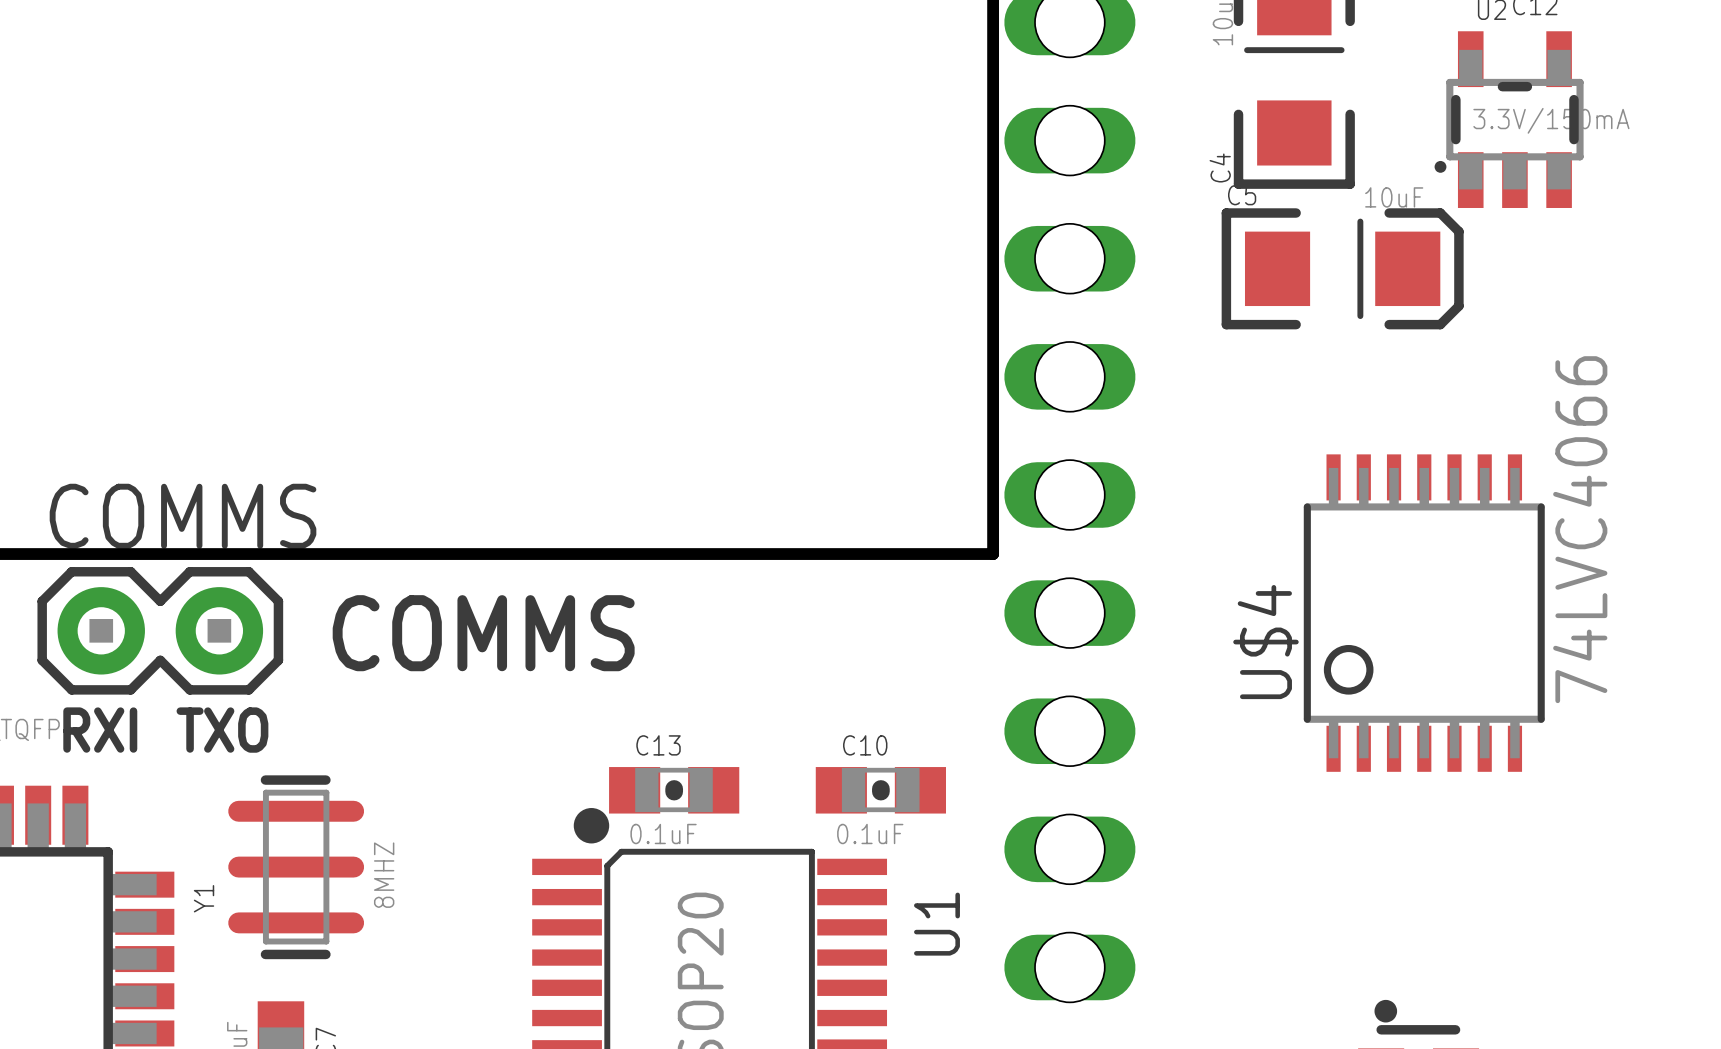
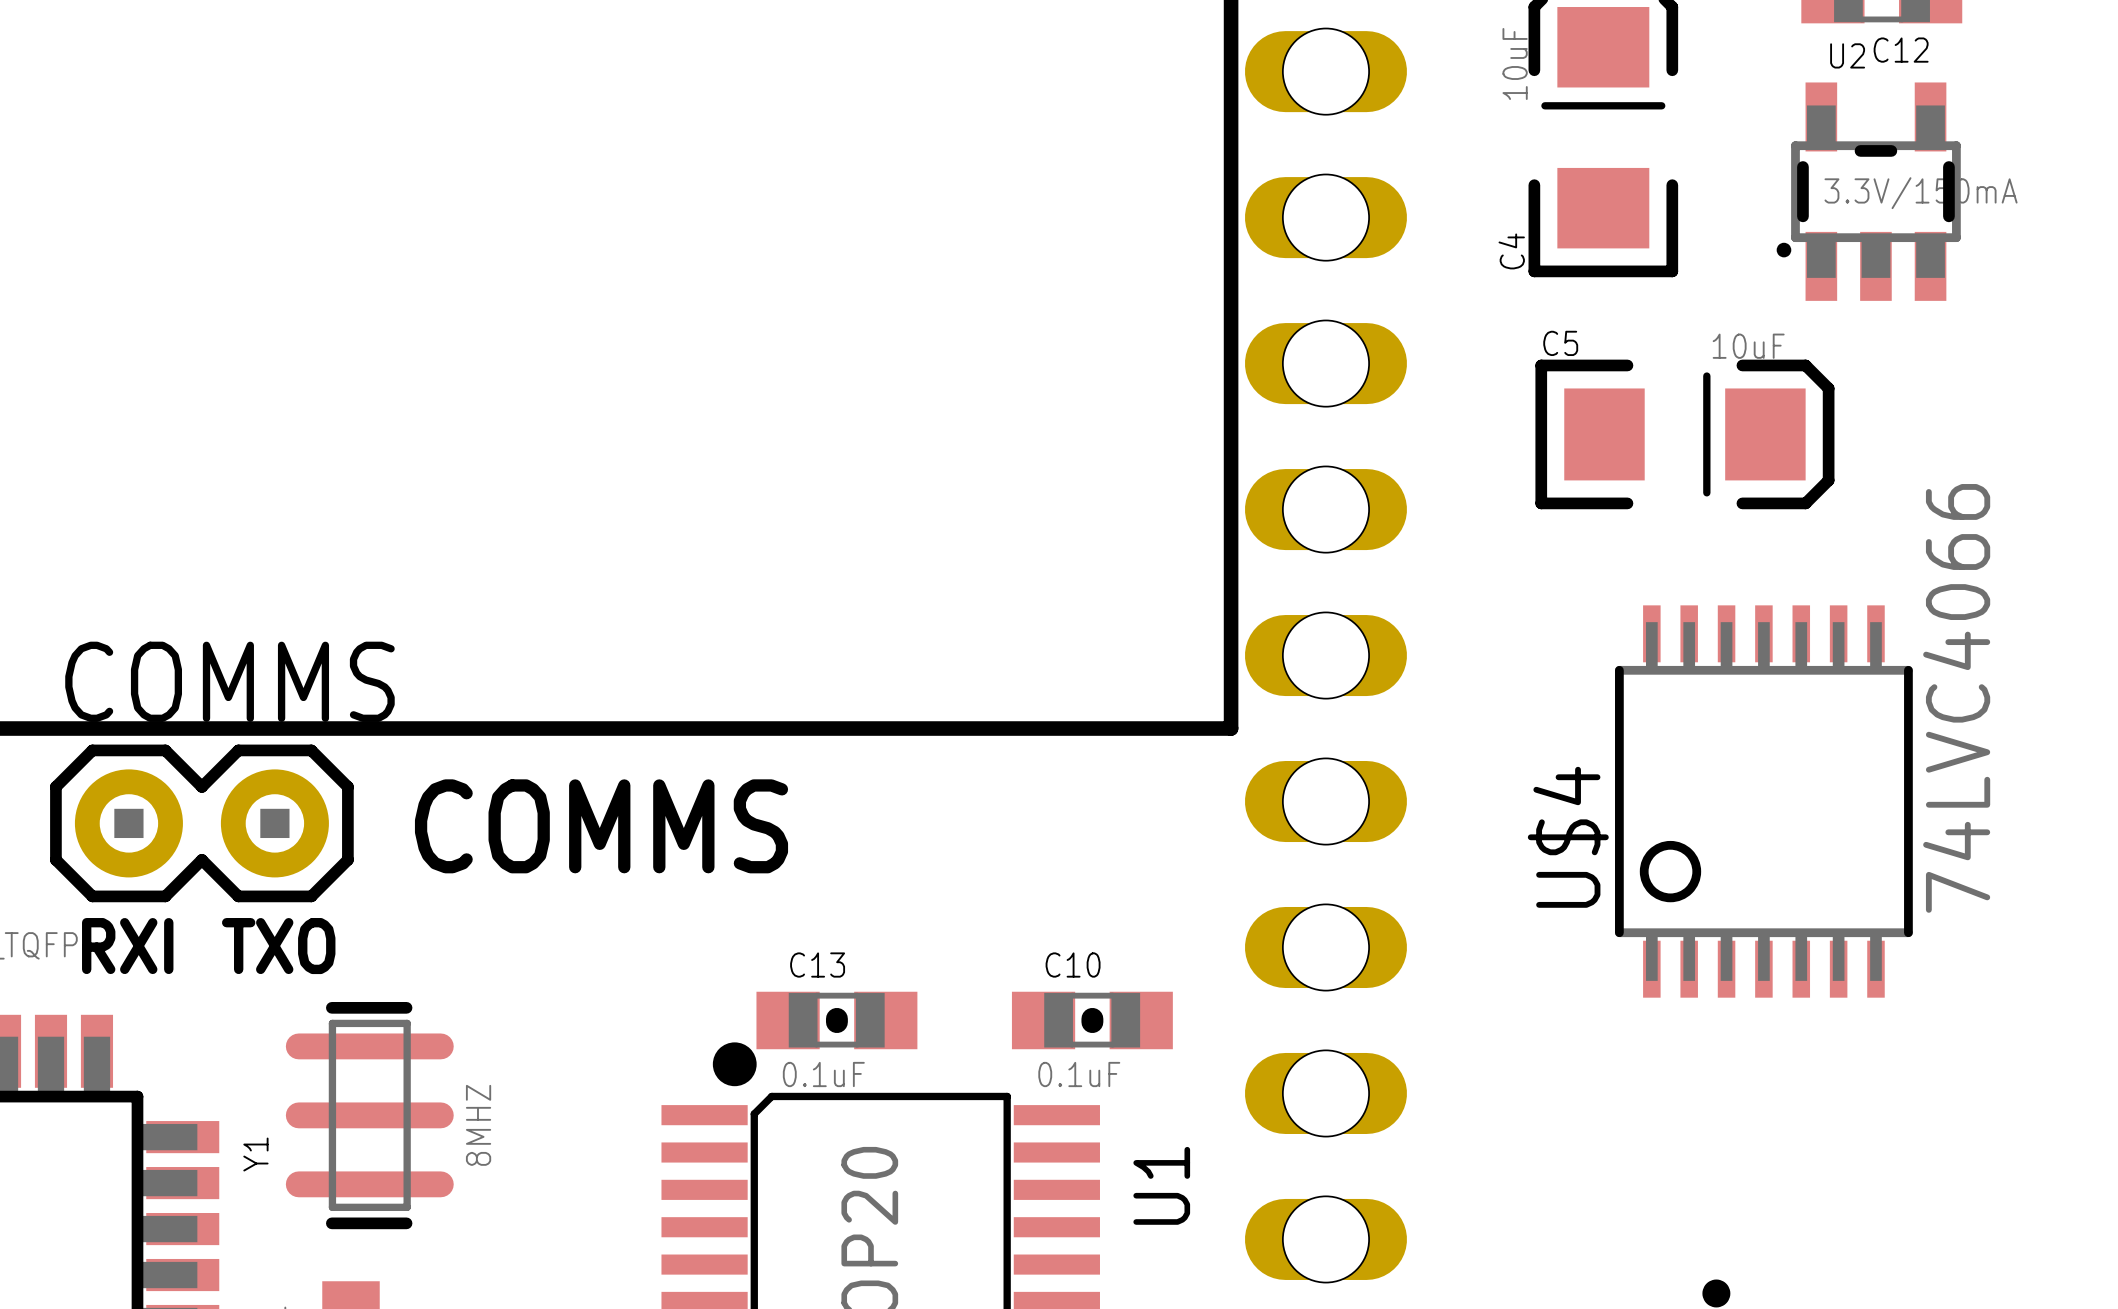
C5 position: (1342, 268) -> (1684, 434)

